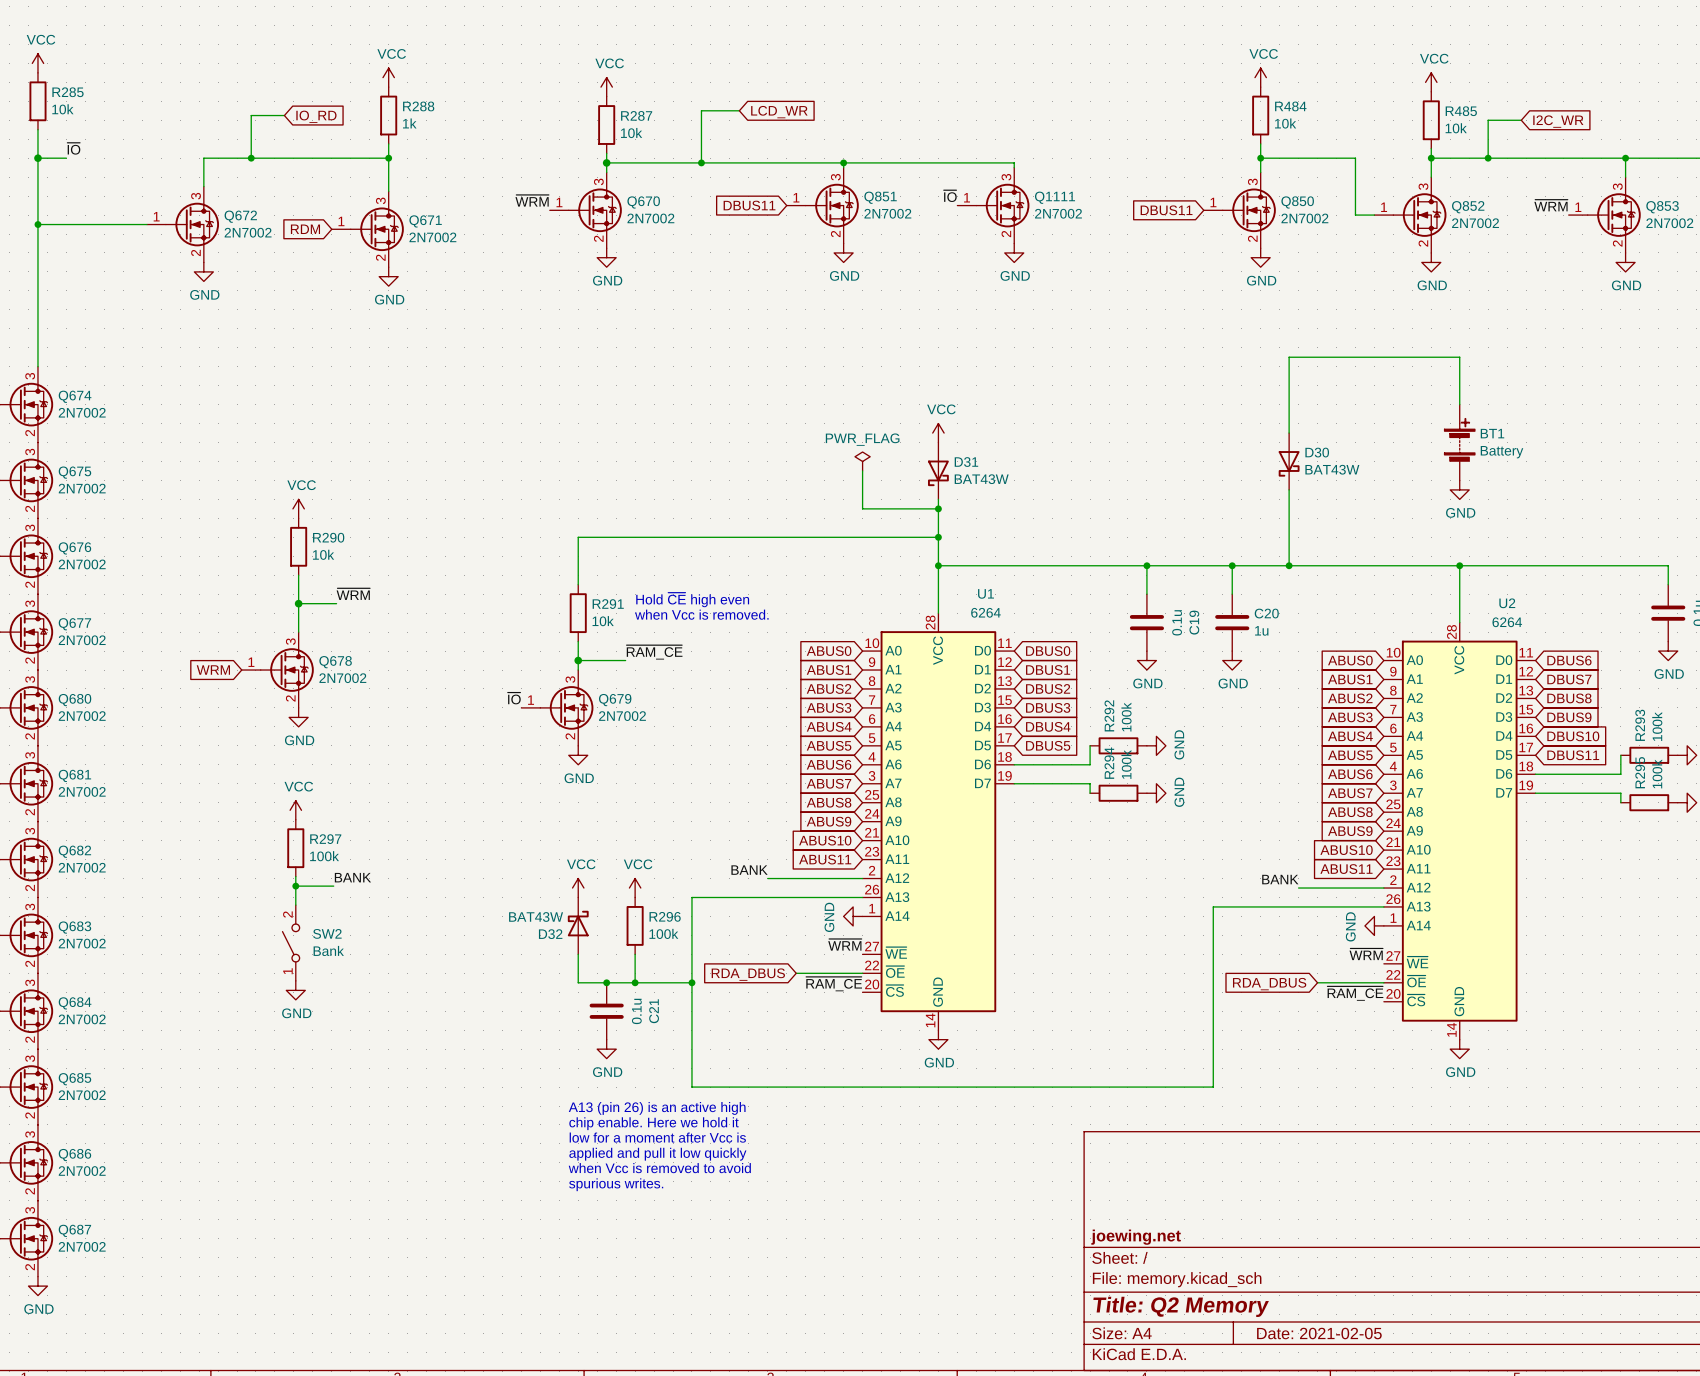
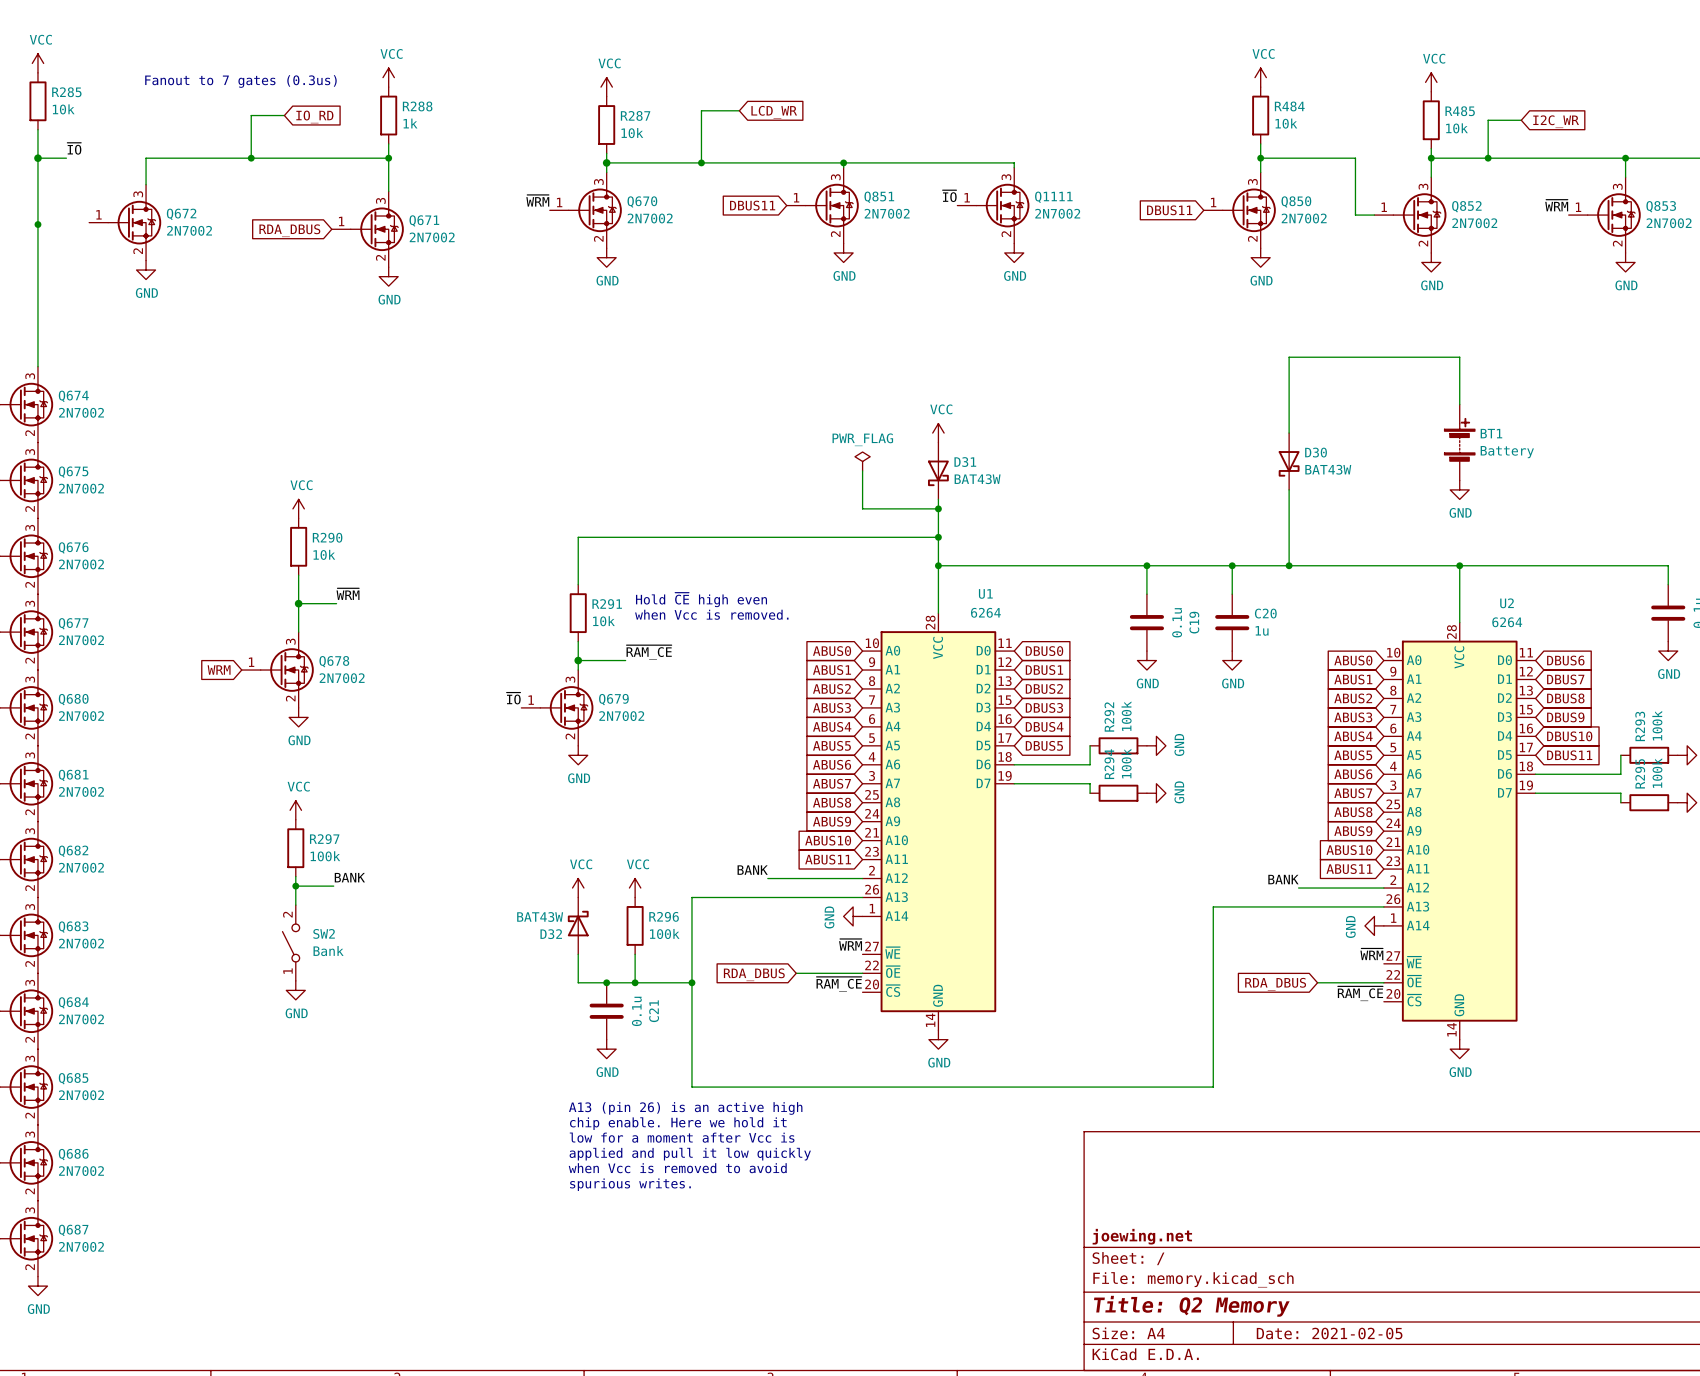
text: none -> Fanout to 7 gates (0.3us) (240, 81)
wire: (203, 158) (203, 186) -> (203, 158) (146, 158) (146, 184)
wire: (37, 224) (146, 224) -> none
Q672 position: (183, 224) -> (125, 222)
global label: RDM (305, 229) -> RDA_DBUS (289, 230)
power symbol position: GND (203, 271) -> GND (146, 270)

